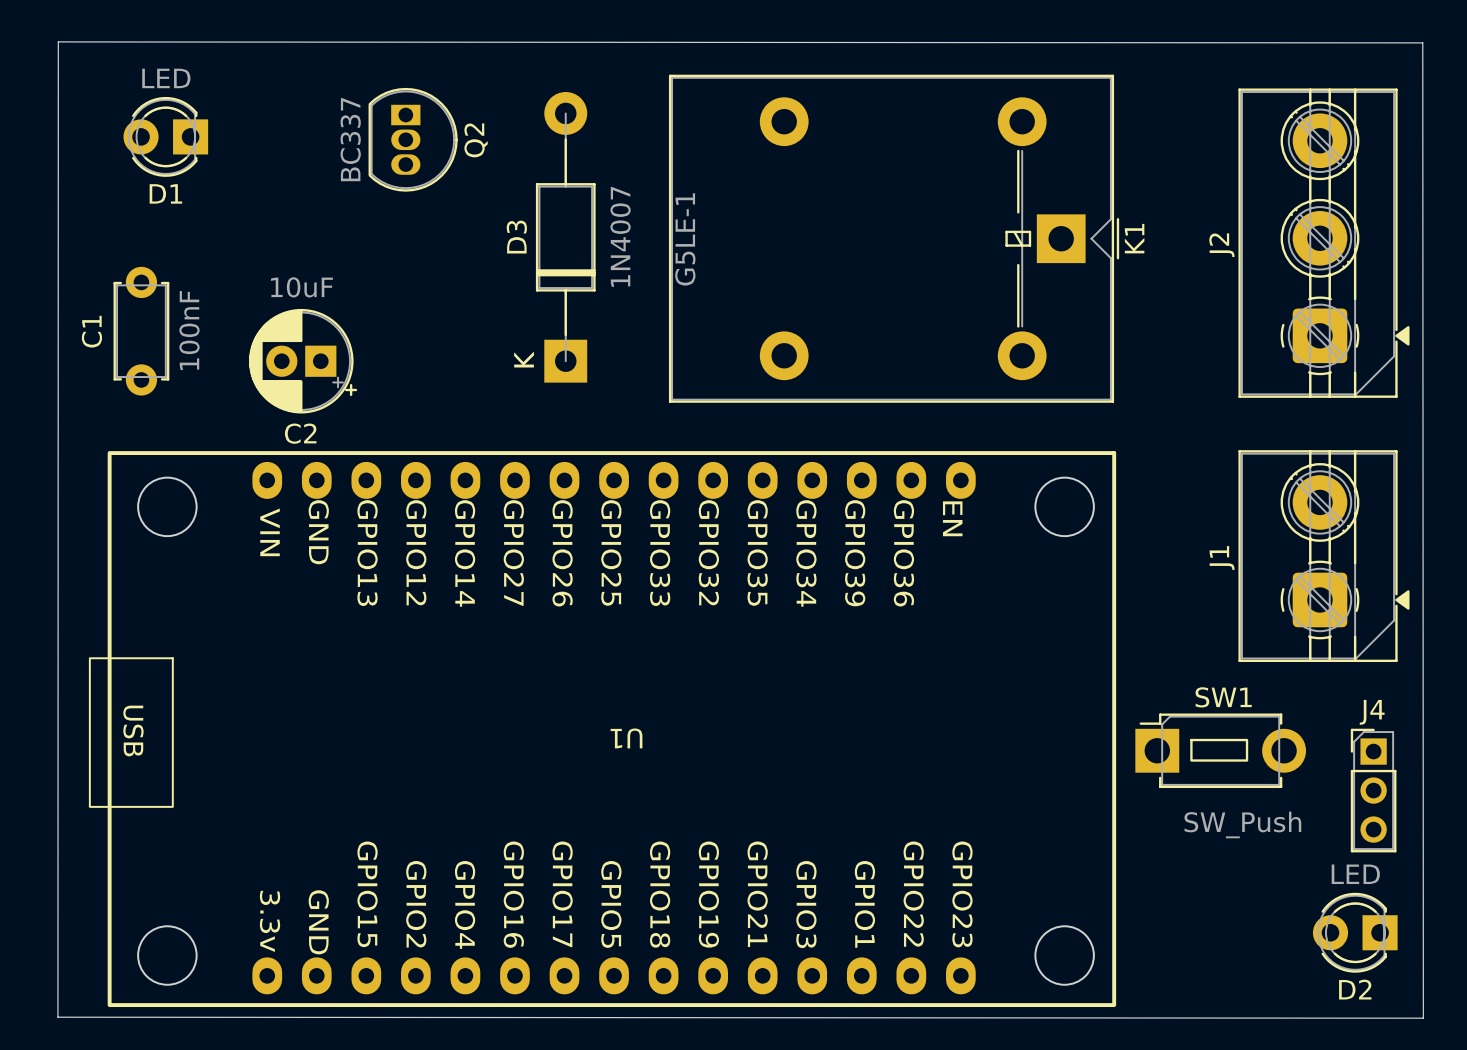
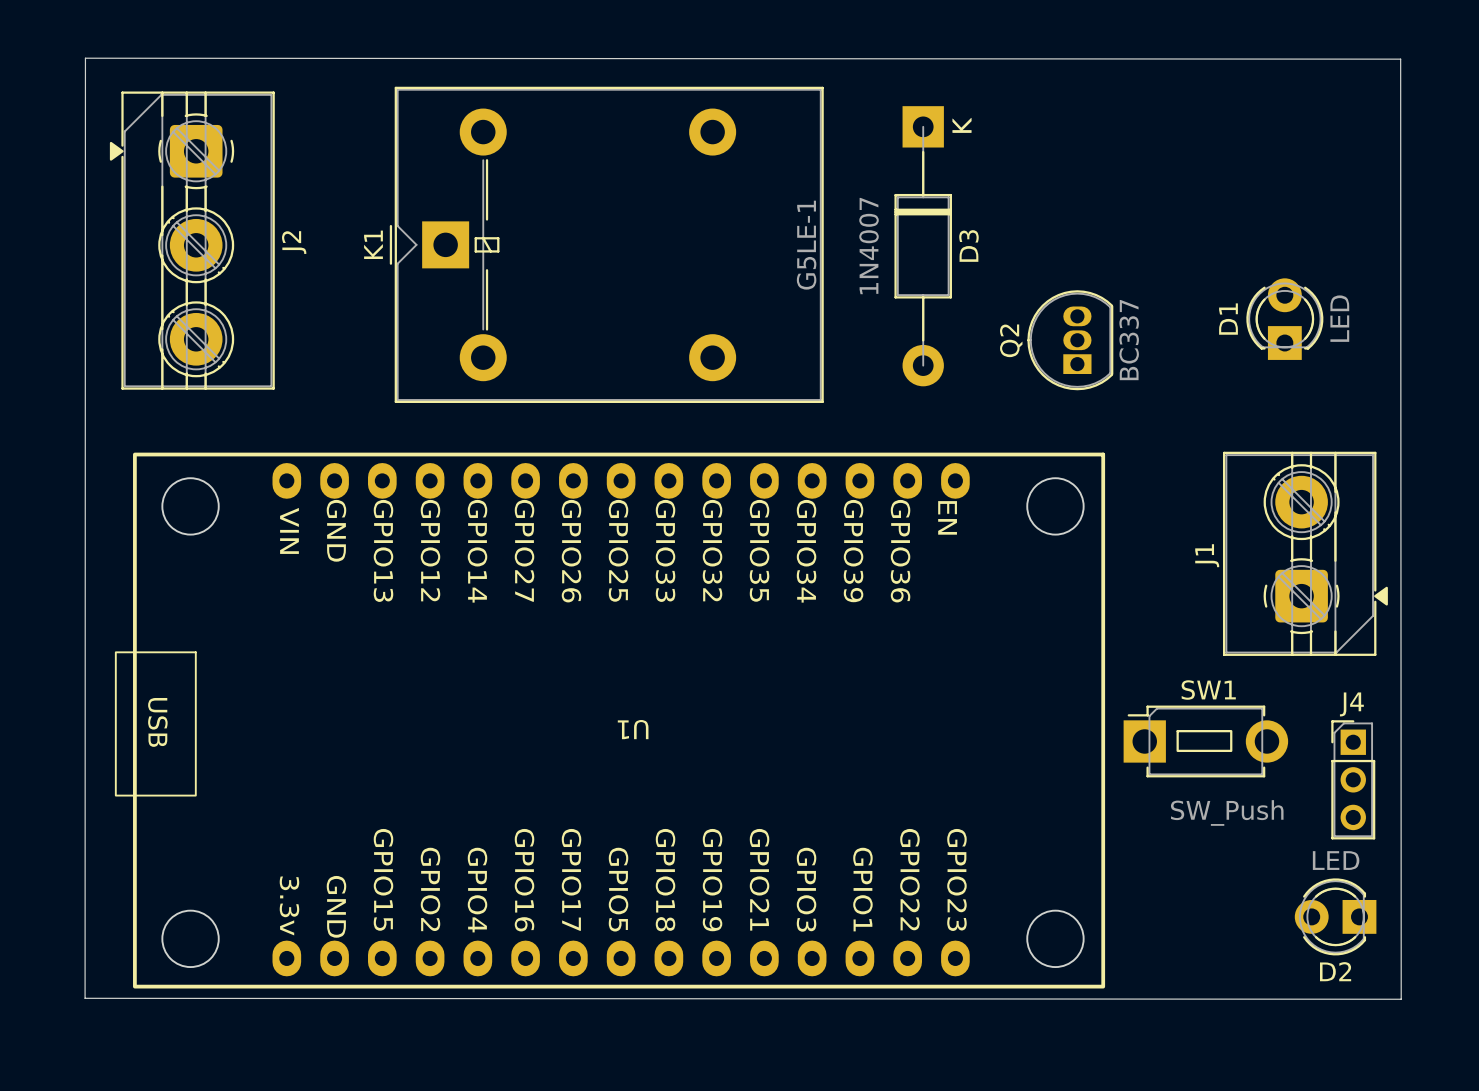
D1 rotation: 0° (165, 136) -> 90° clockwise (1284, 319)
D1 position: (165, 136) -> (1284, 319)
Q2 rotation: 0° (413, 139) -> 180° (1070, 340)
Q2 position: (413, 139) -> (1070, 340)
D3 rotation: 0° (565, 237) -> 180° (923, 246)
D3 position: (565, 237) -> (923, 246)
K1 rotation: 0° (894, 238) -> 180° (606, 244)
K1 position: (894, 238) -> (606, 244)
J2 rotation: 0° (1323, 243) -> 180° (192, 240)
J2 position: (1323, 243) -> (192, 240)
C1: 100nF (141, 331) -> none
C2: 10uF (303, 361) -> none

